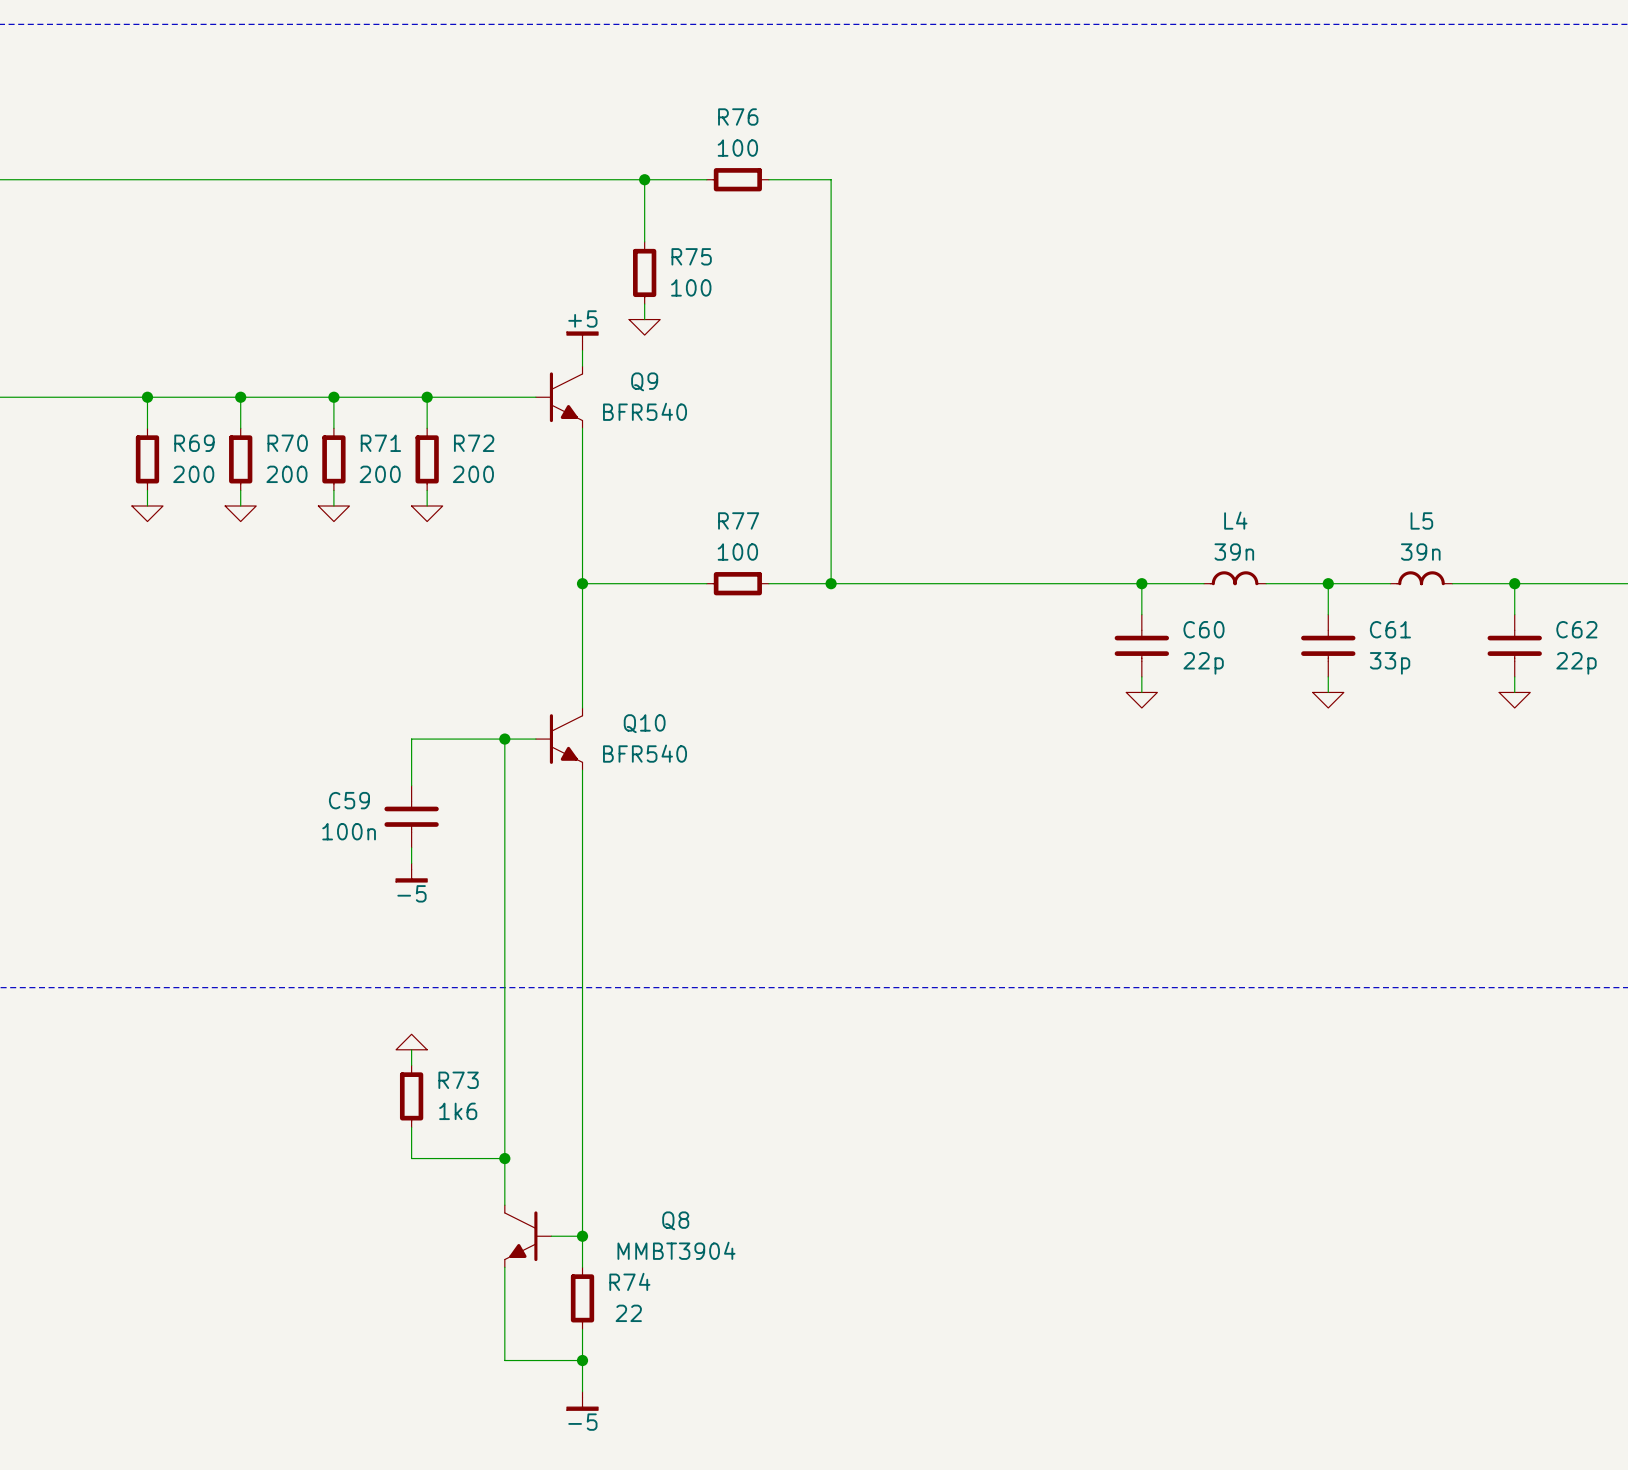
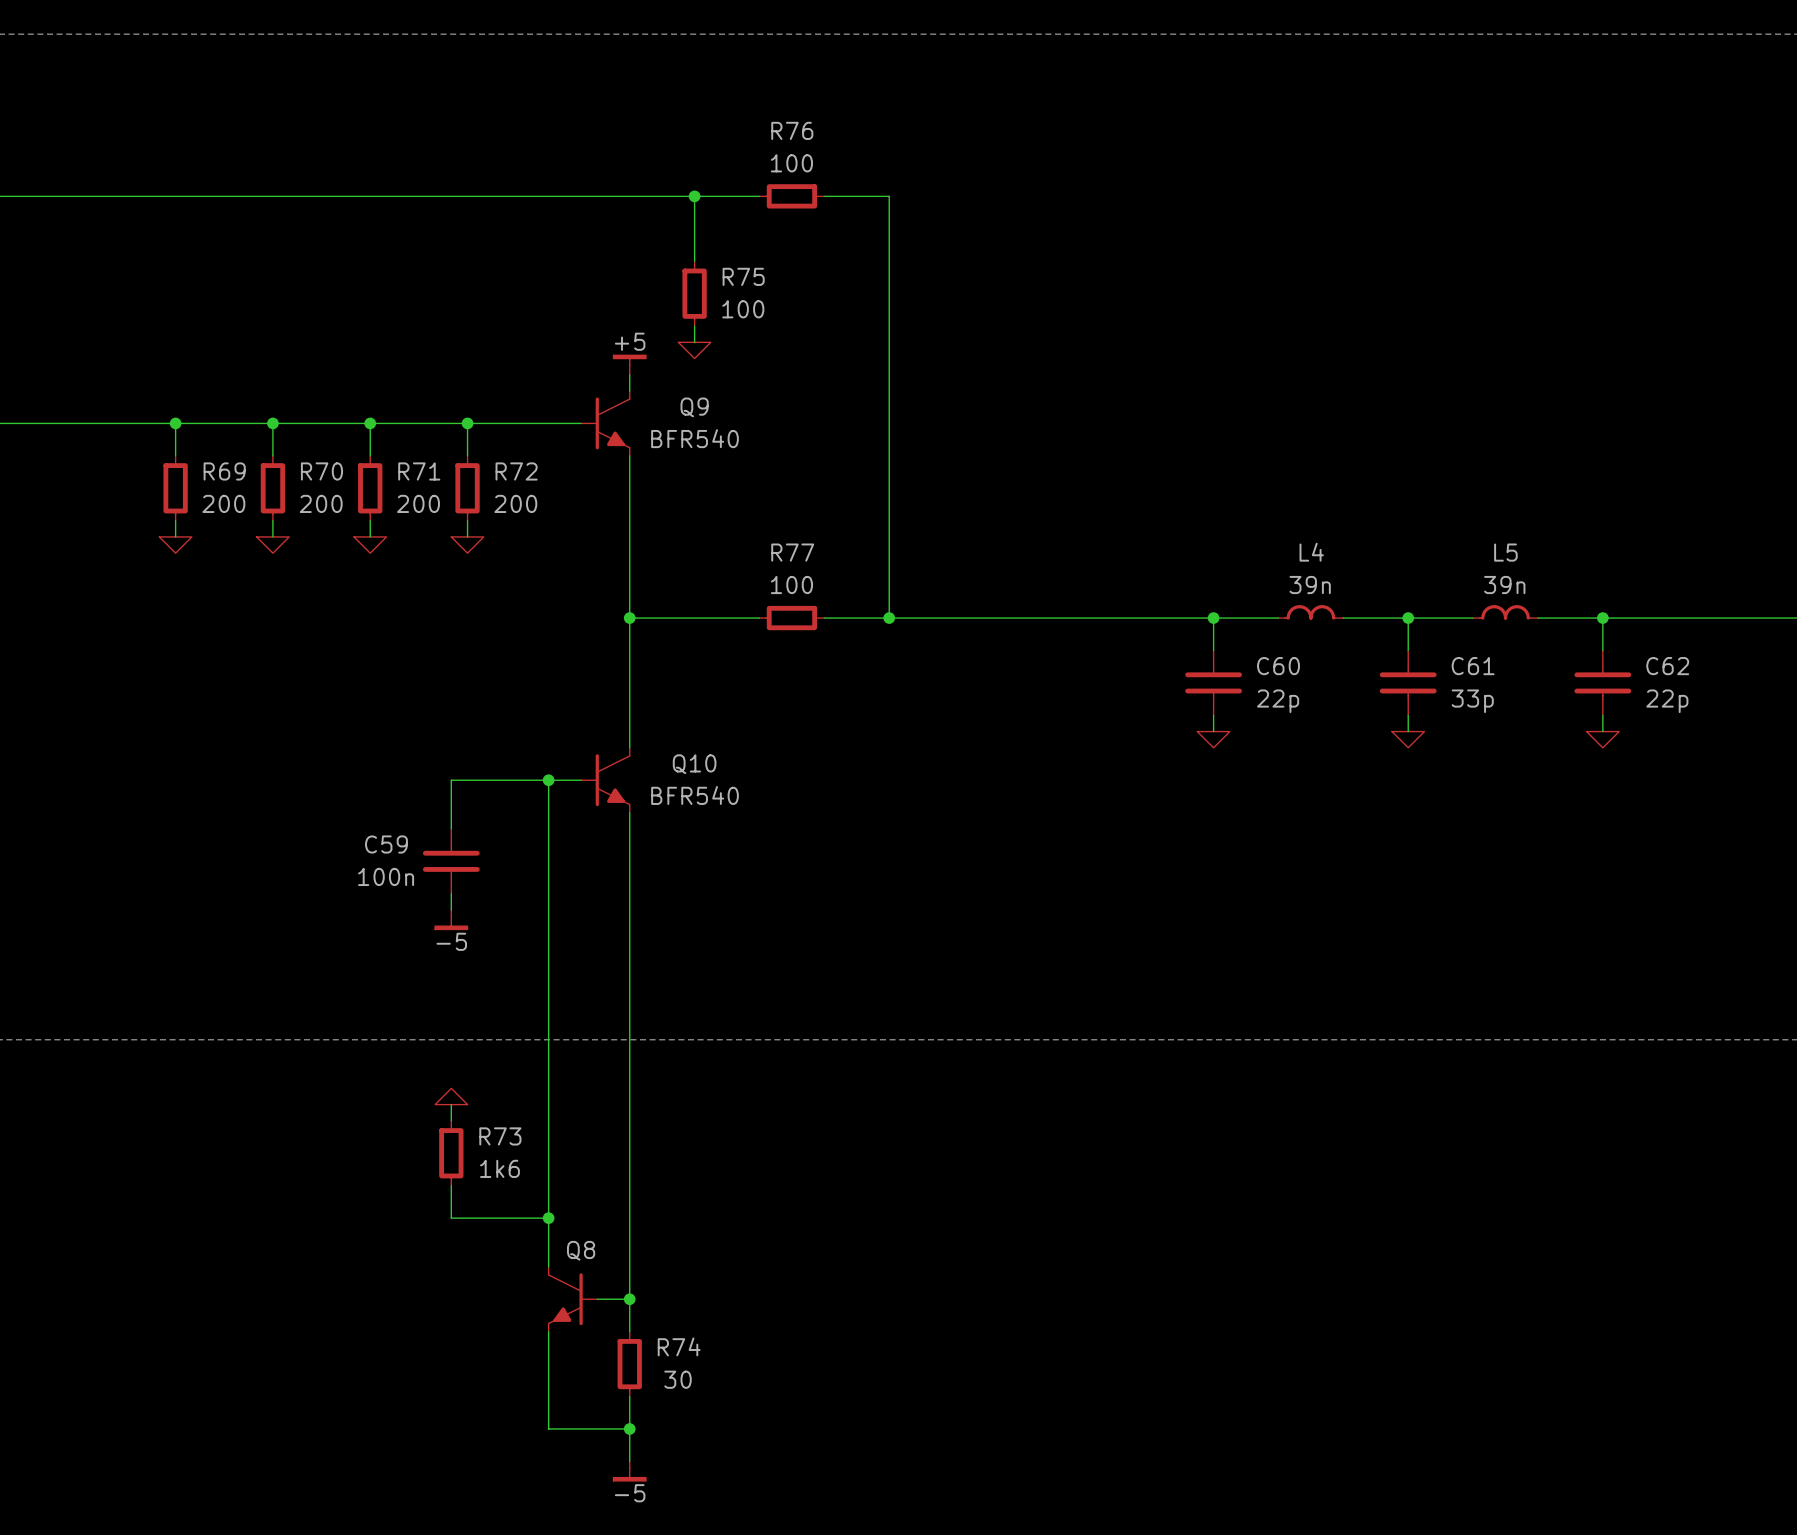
Q8 name position: Q8 (675, 1220) -> Q8 (581, 1250)
Q8 value: MMBT3904 (676, 1250) -> none
R74 value: 22 (628, 1313) -> 30 (678, 1379)

